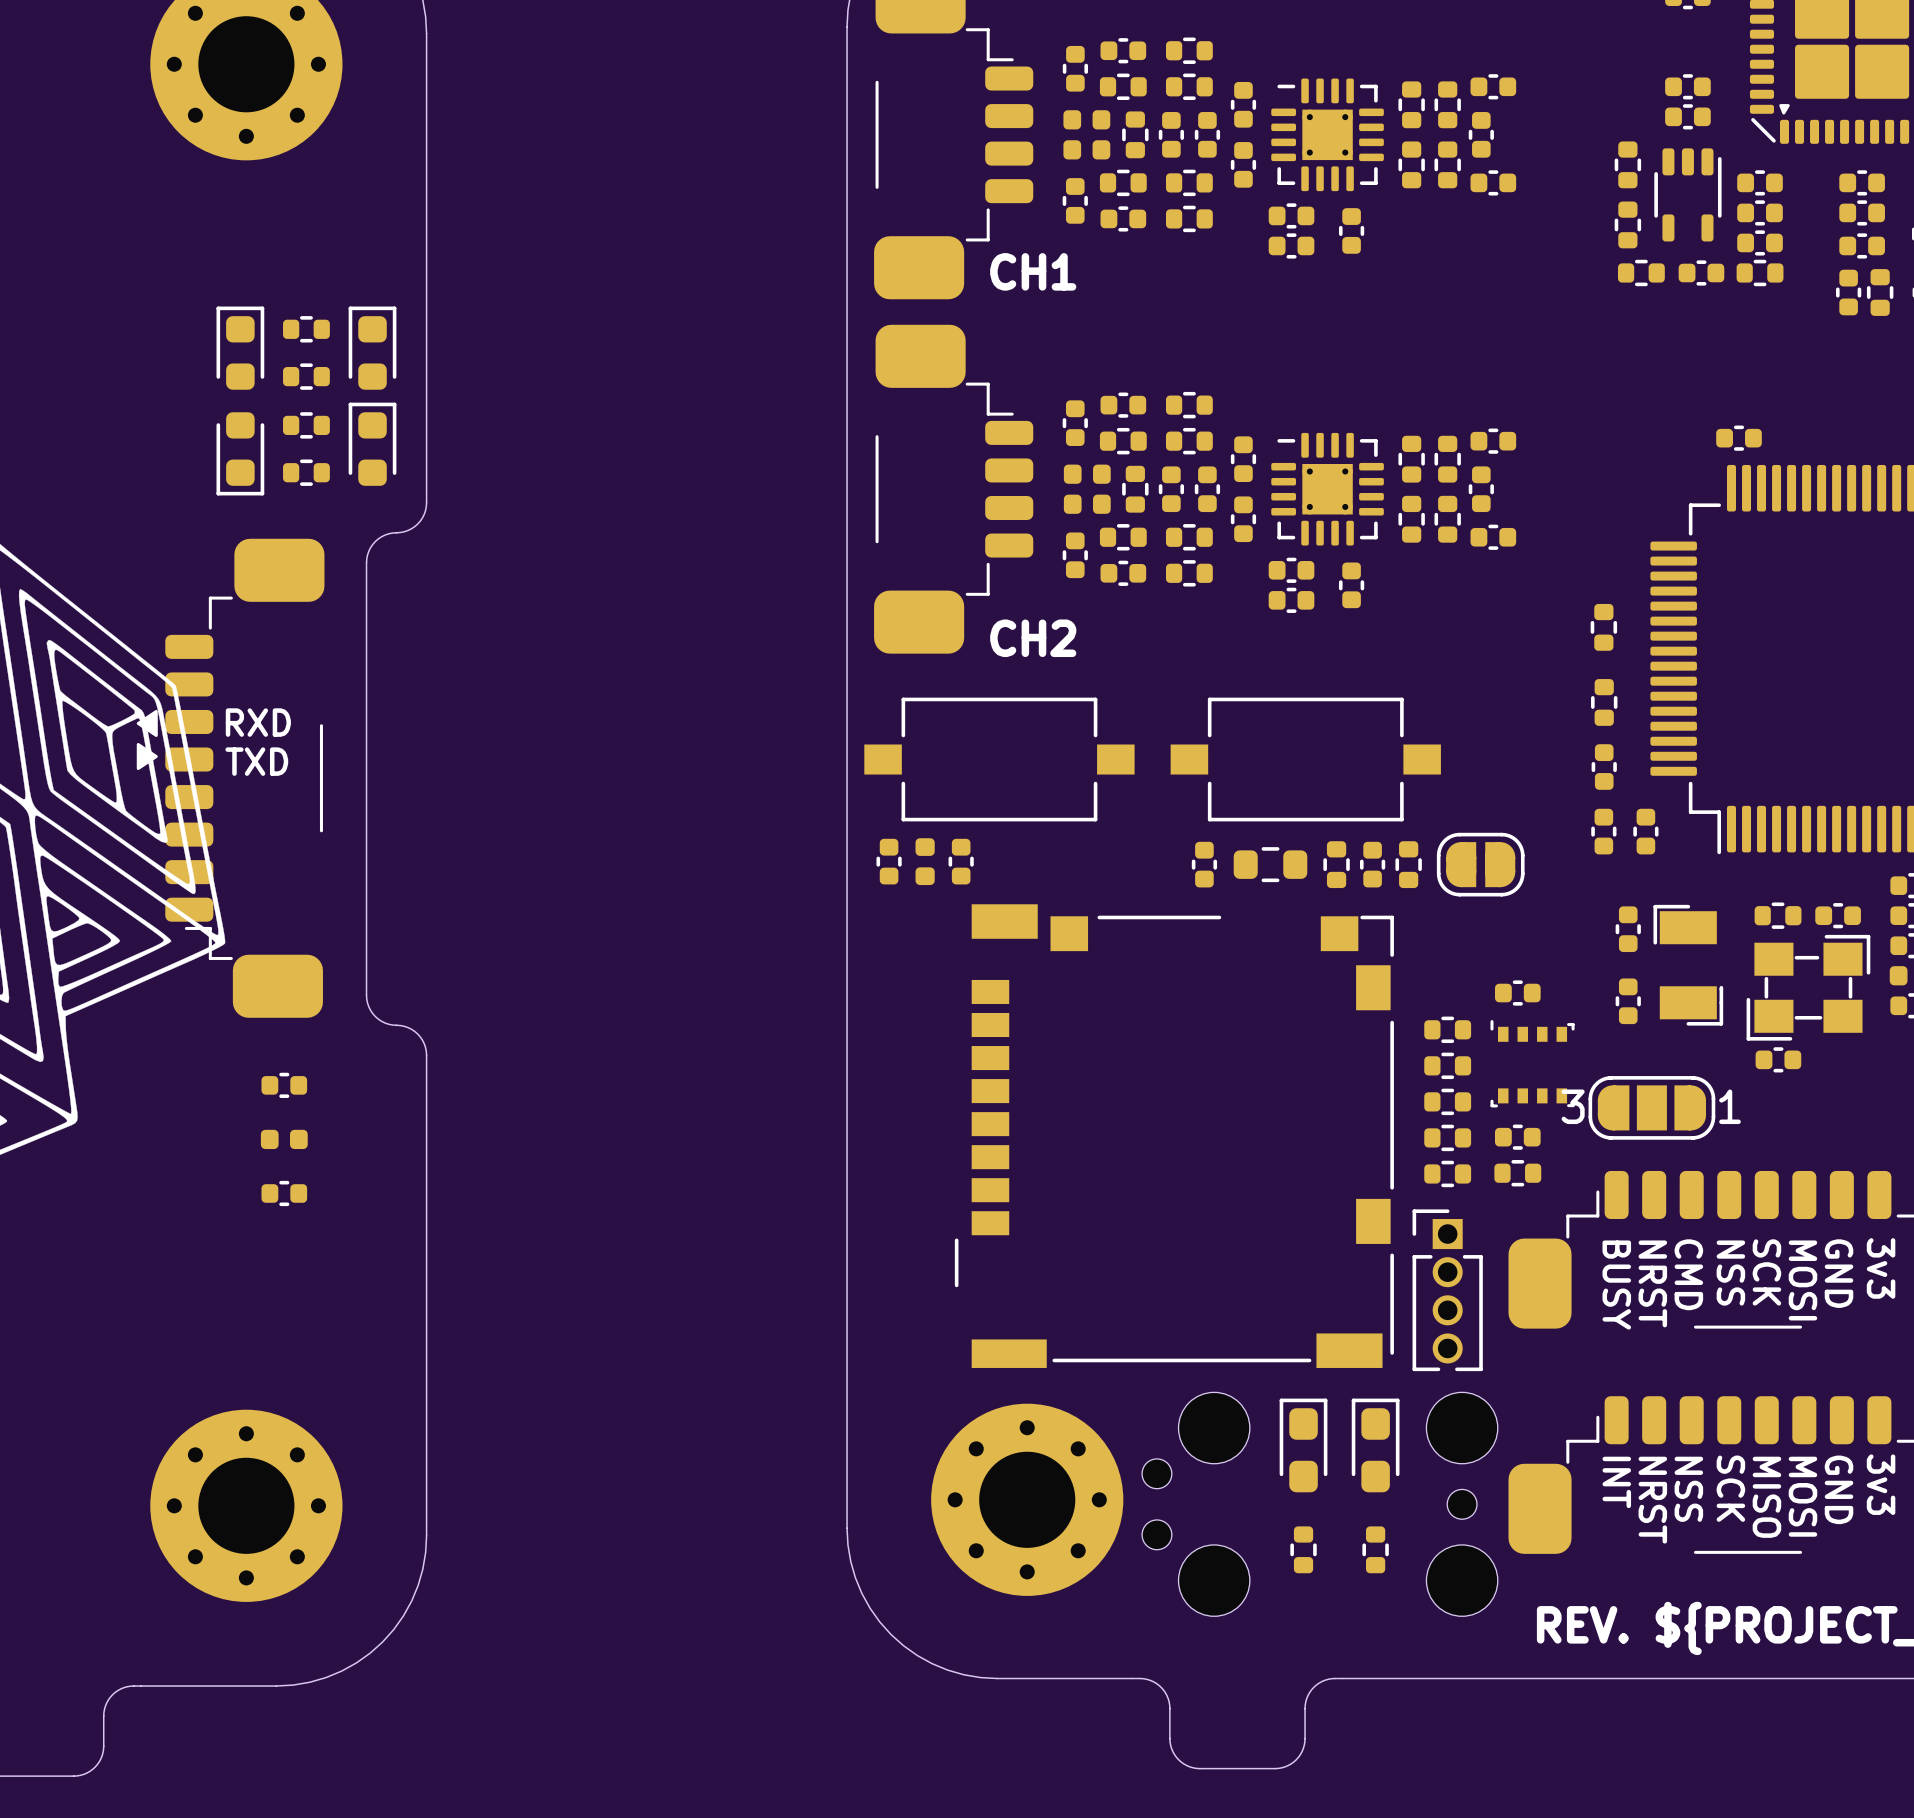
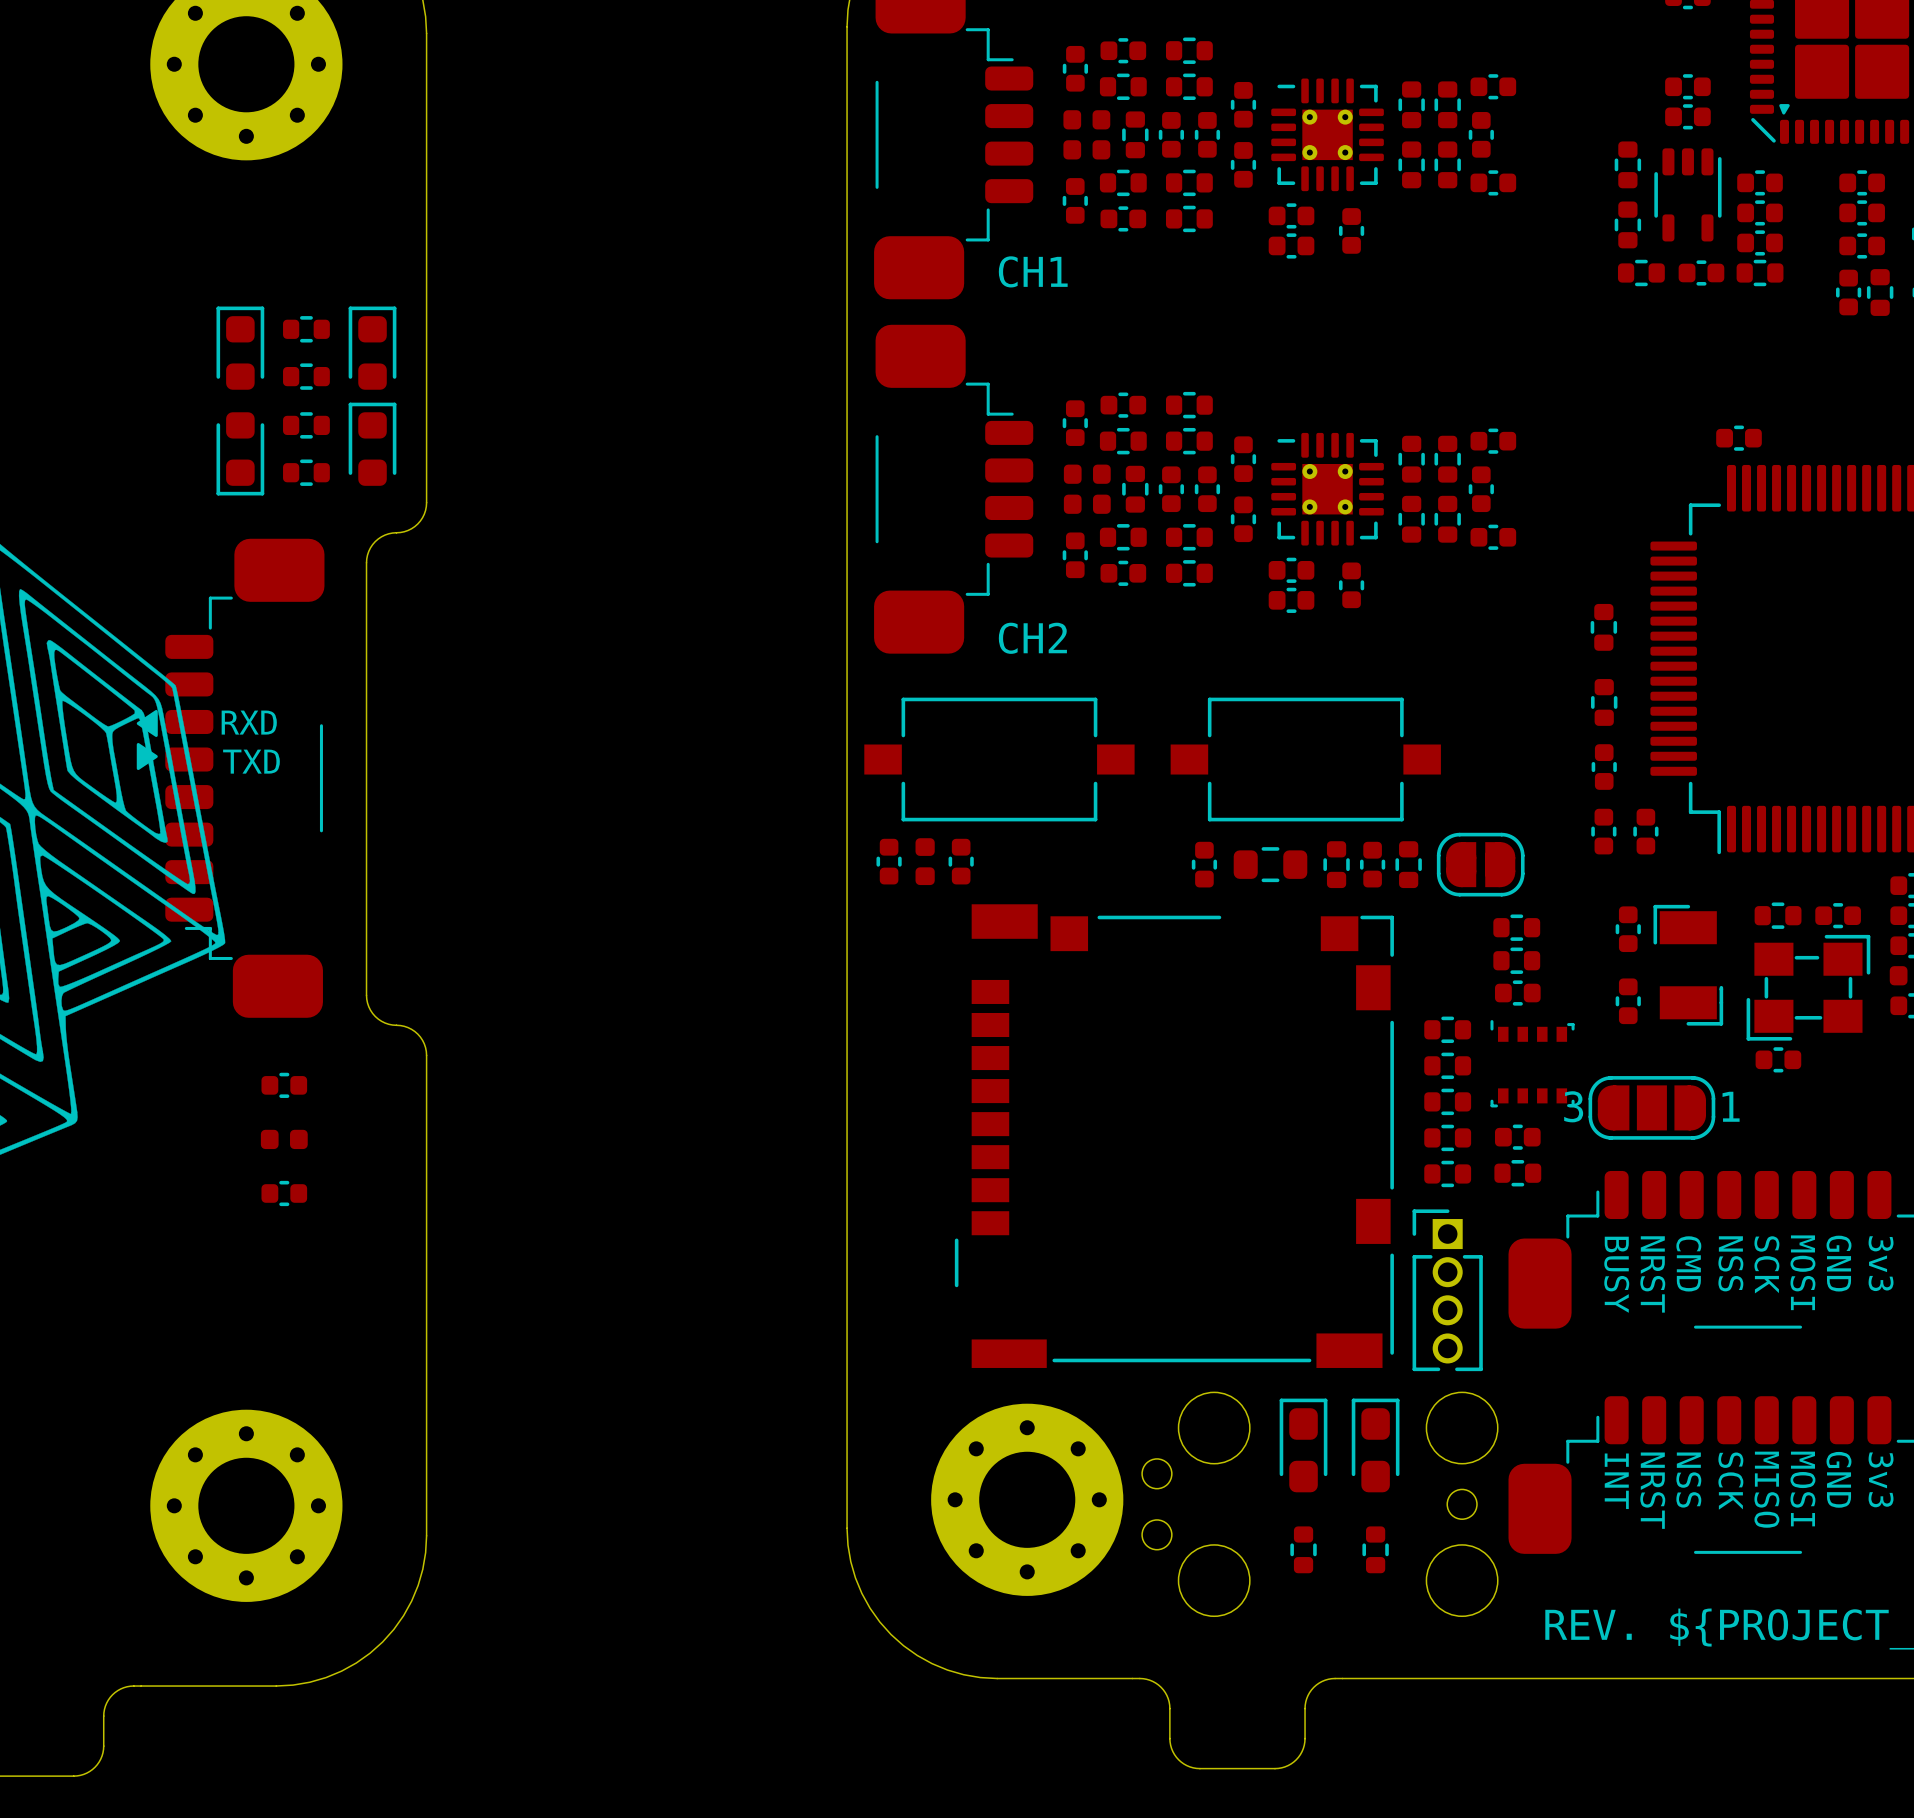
part: none -> (1516, 927)
part: none -> (1516, 960)

